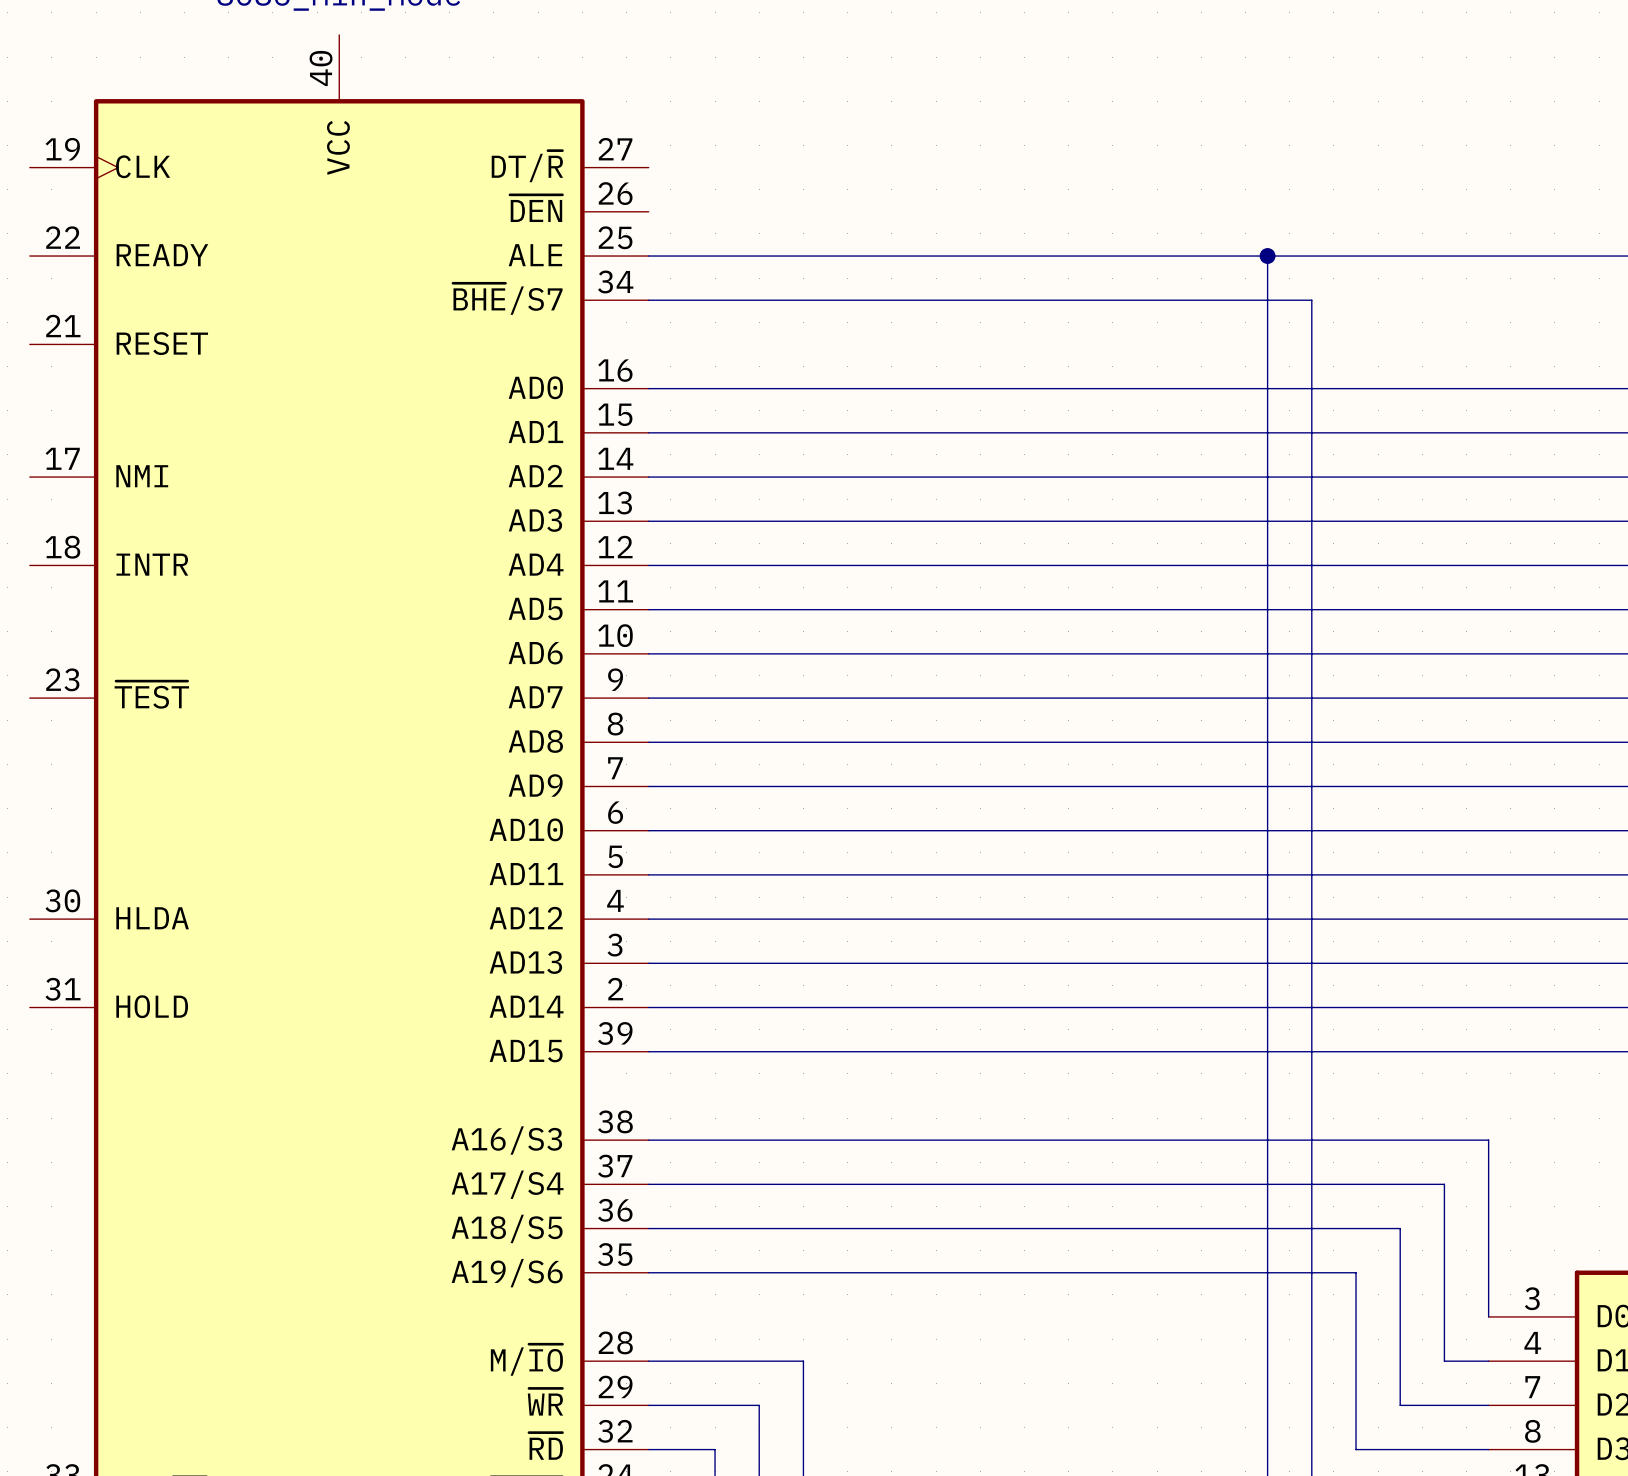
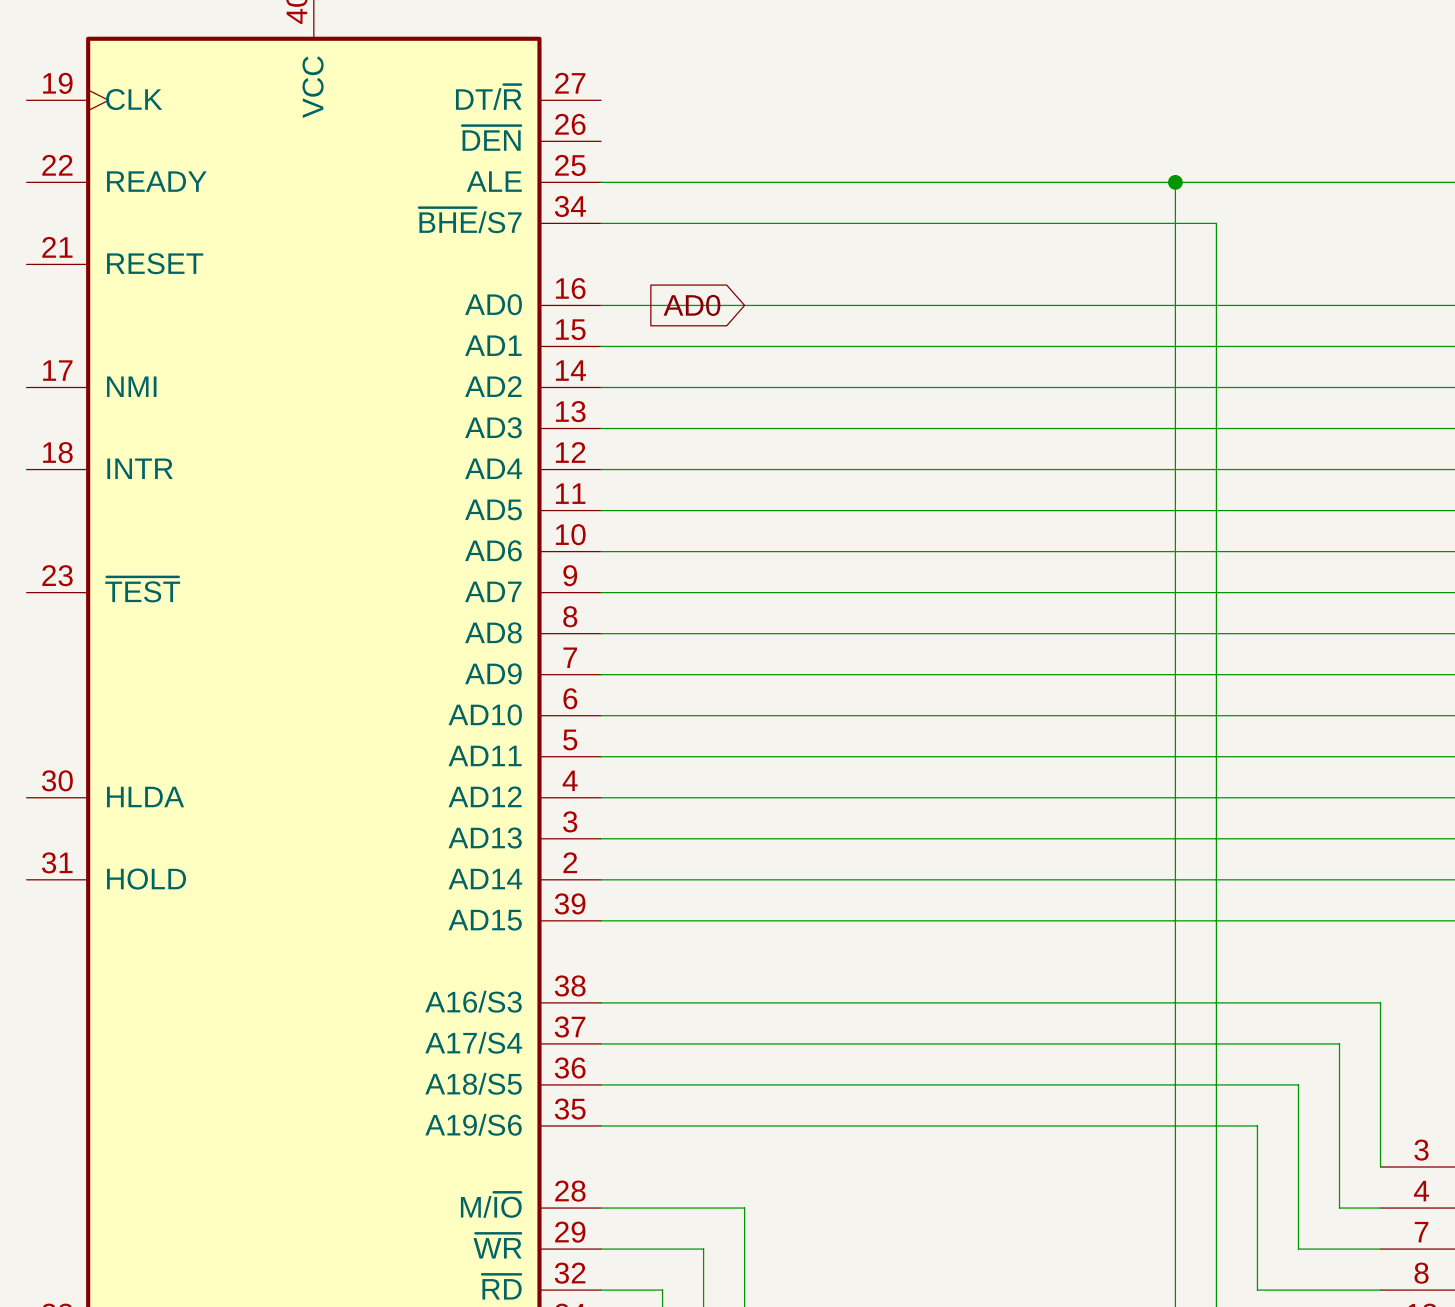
global label: none -> AD0 (691, 305)

